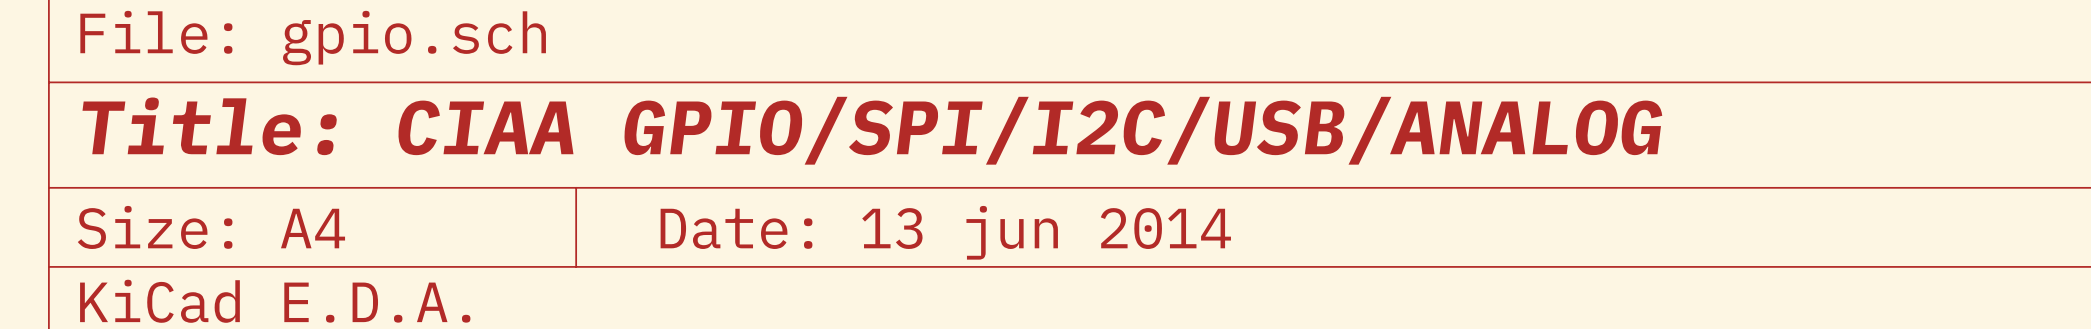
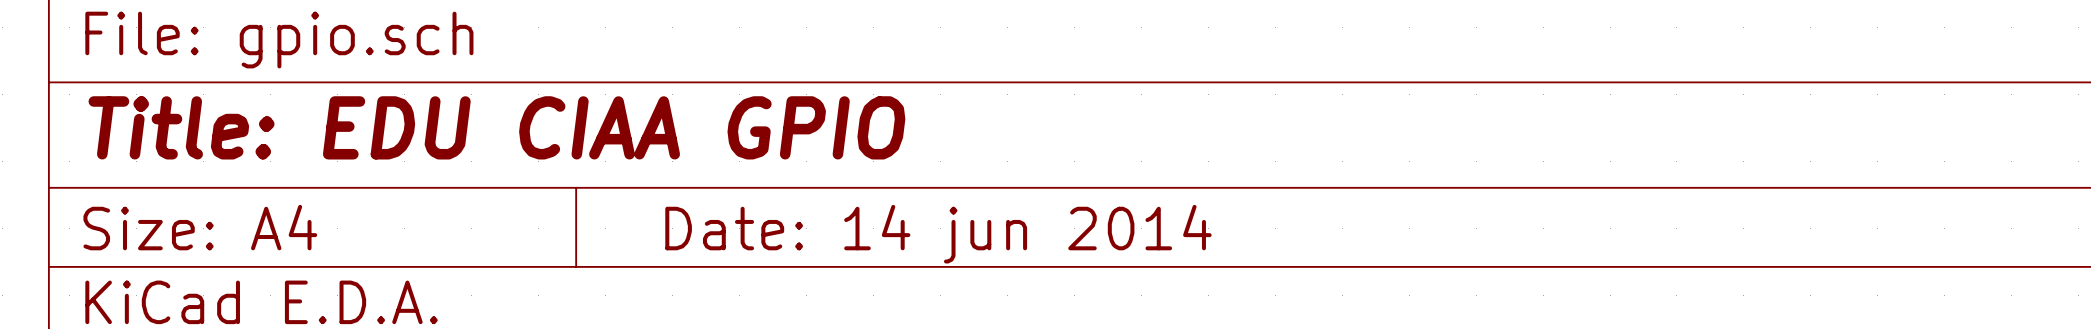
title block: Title: CIAA GPIO/SPI/I2C/USB/ANALOG (872, 130) -> Title: EDU CIAA GPIO (496, 127)
title block: Date: 13 jun 2014 (945, 232) -> Date: 14 jun 2014 (938, 234)

